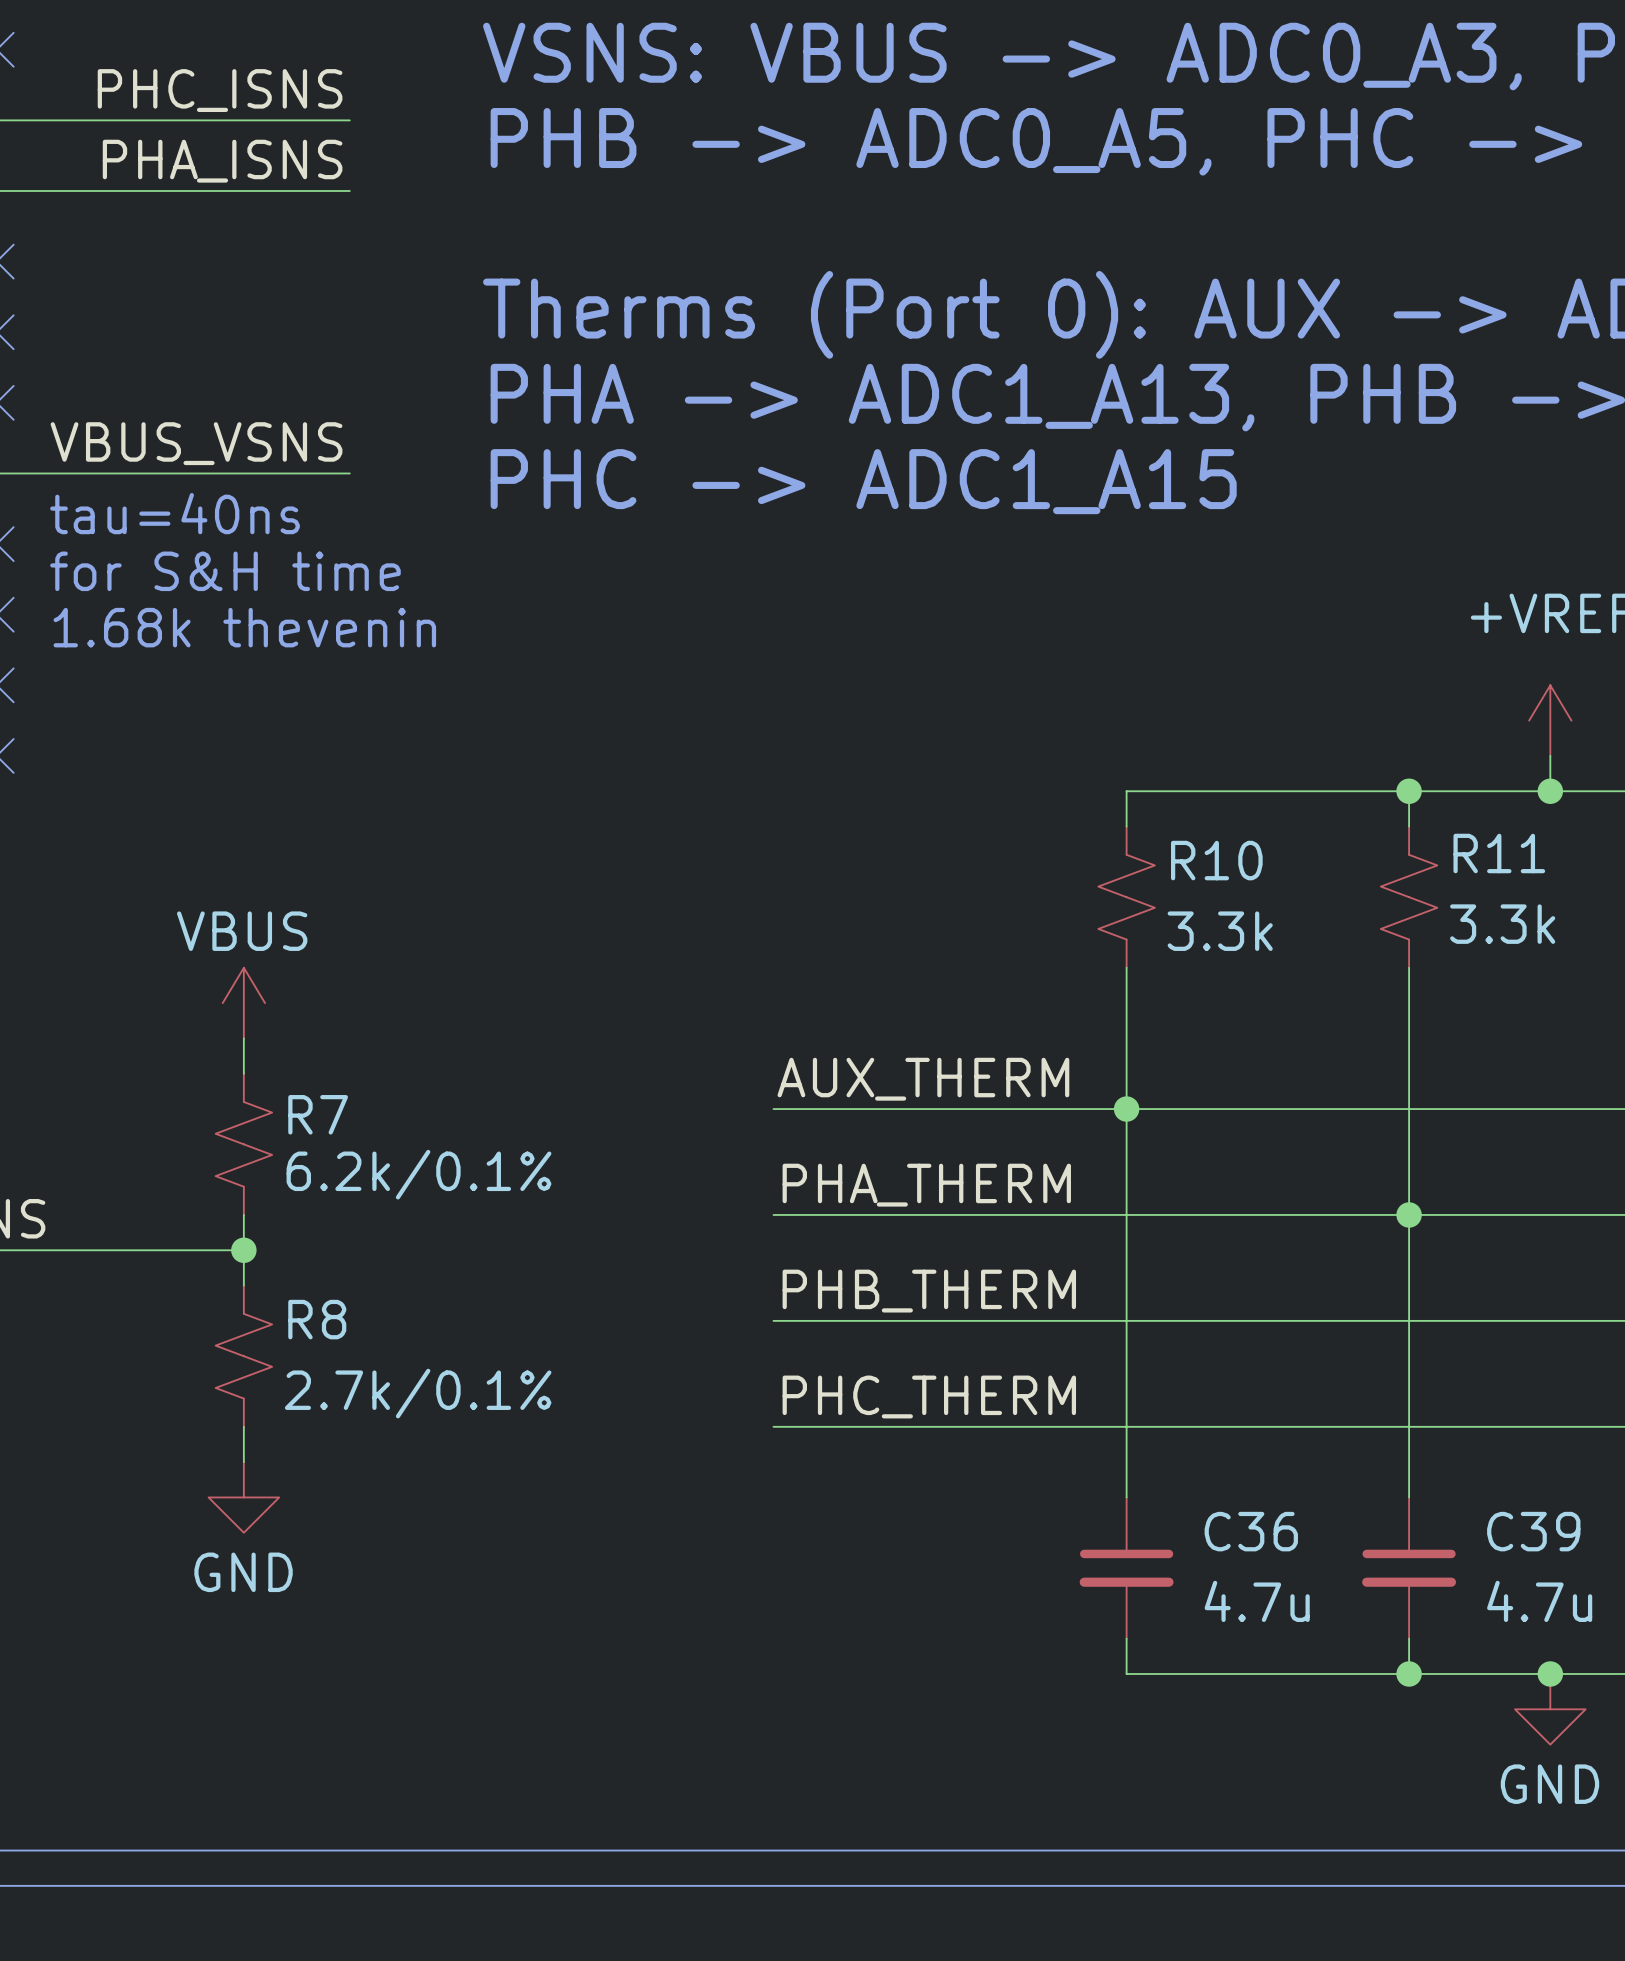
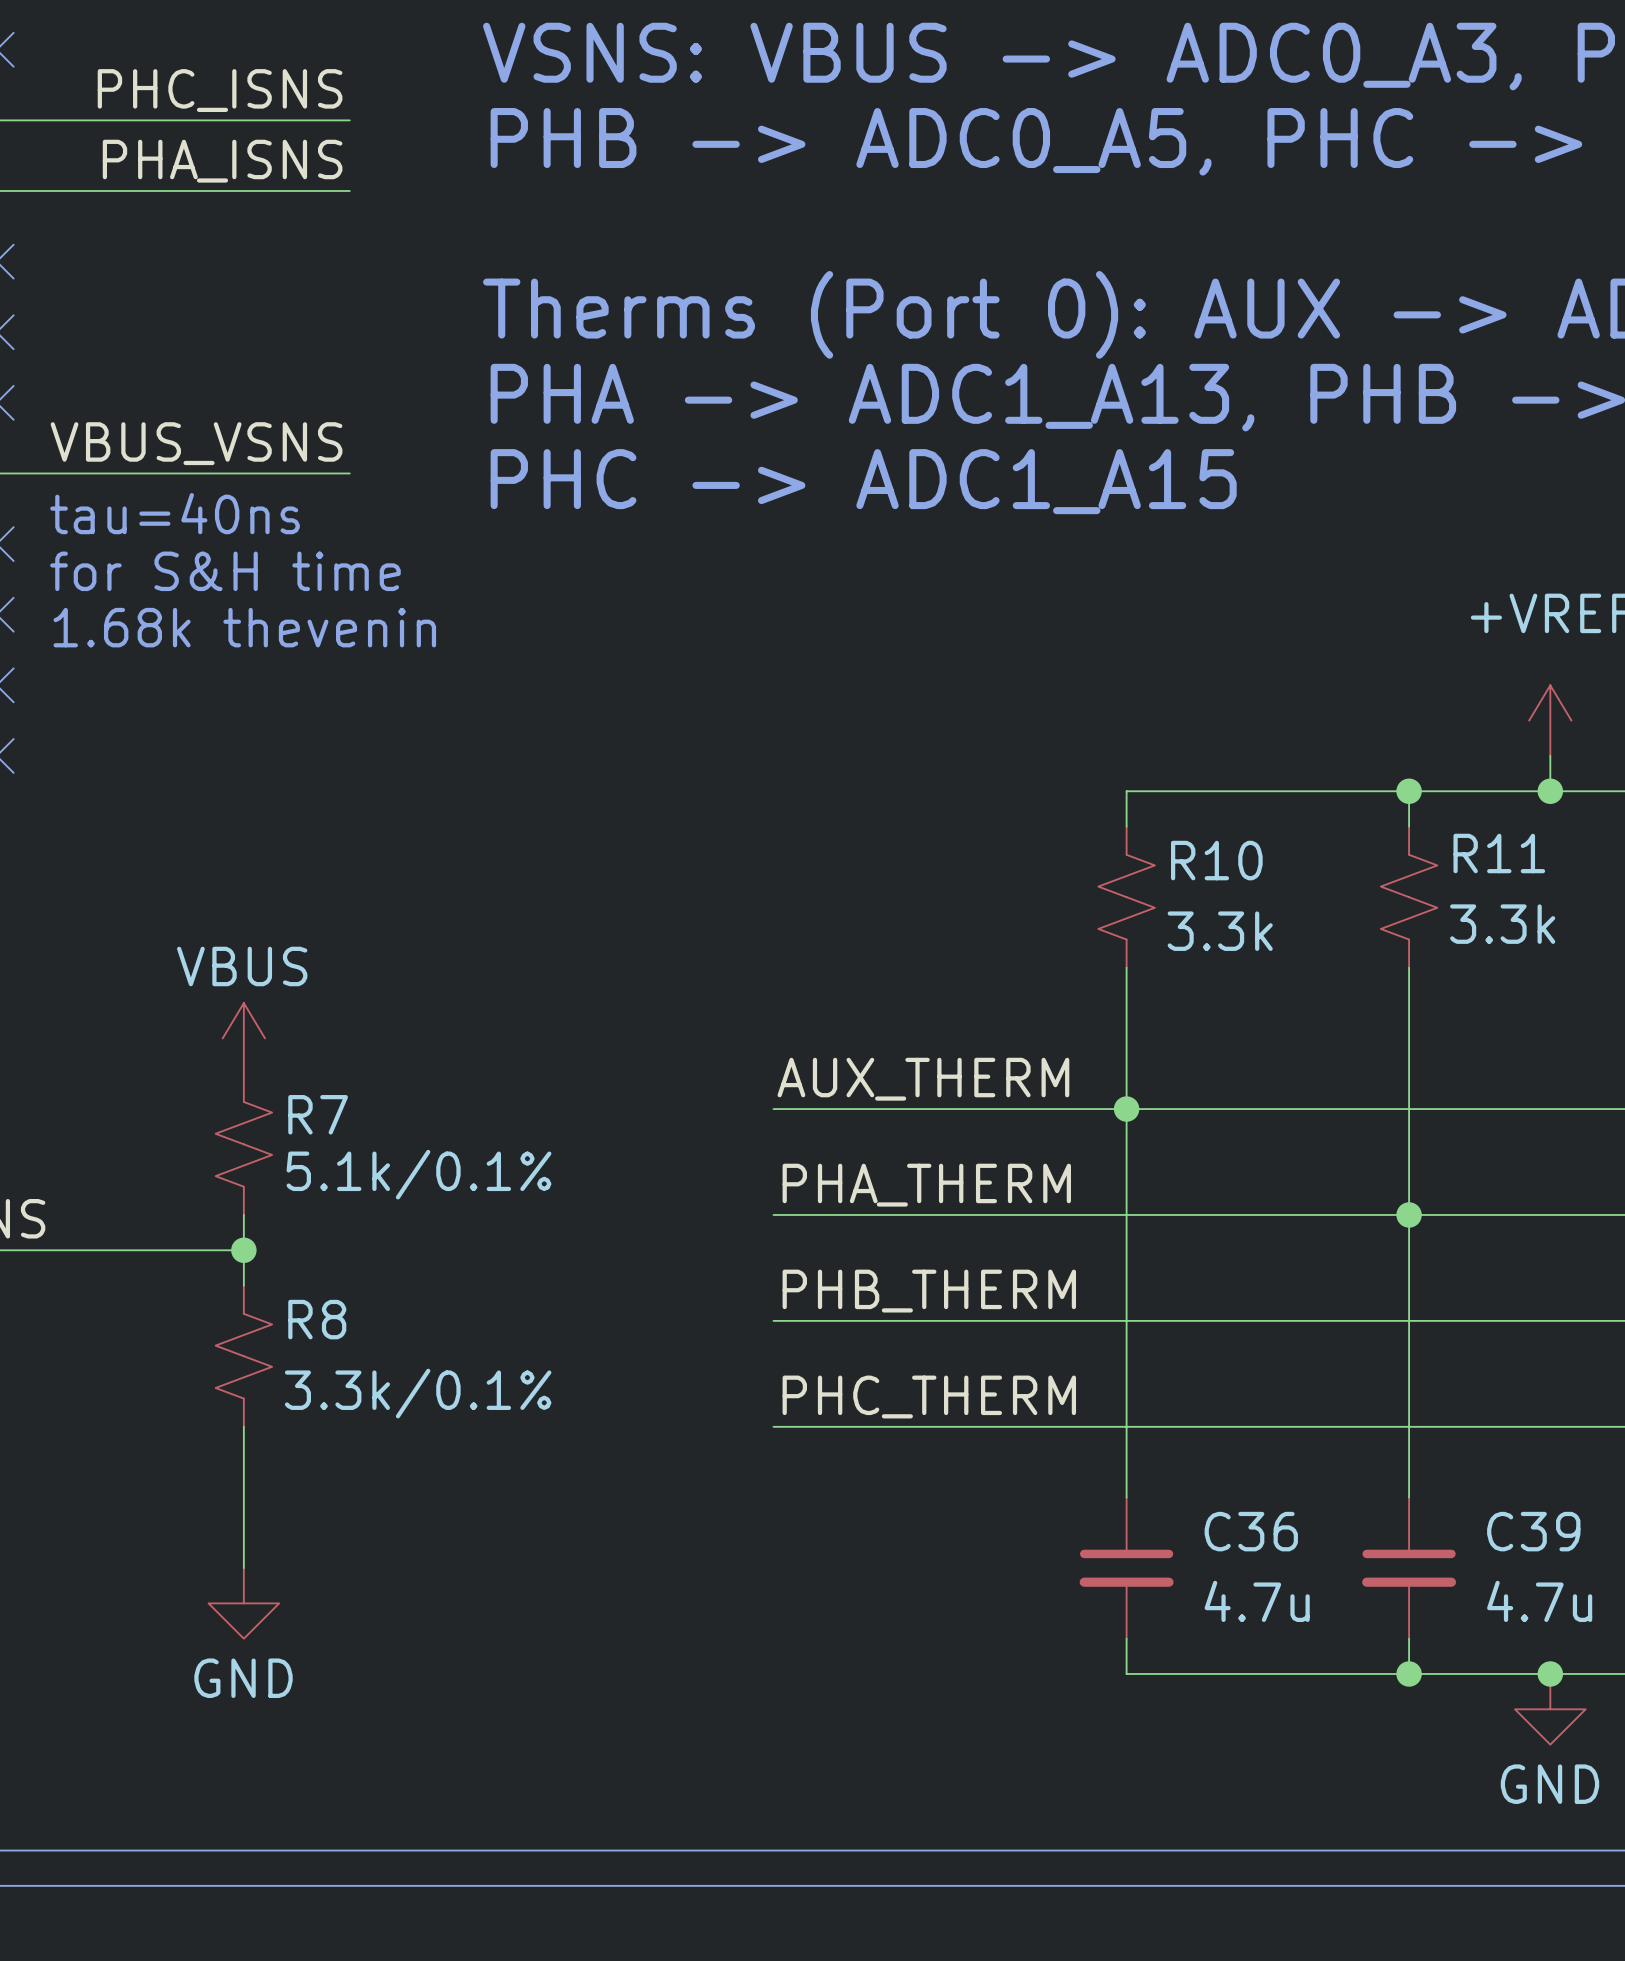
power symbol position: VBUS (243, 1003) -> VBUS (243, 1038)
R7 value: 6.2k/0.1% (419, 1174) -> 5.1k/0.1% (419, 1174)
R8 value: 2.7k/0.1% (418, 1393) -> 3.3k/0.1% (418, 1393)
wire: none -> (243, 1462) (243, 1568)
power symbol position: GND (243, 1497) -> GND (243, 1603)

